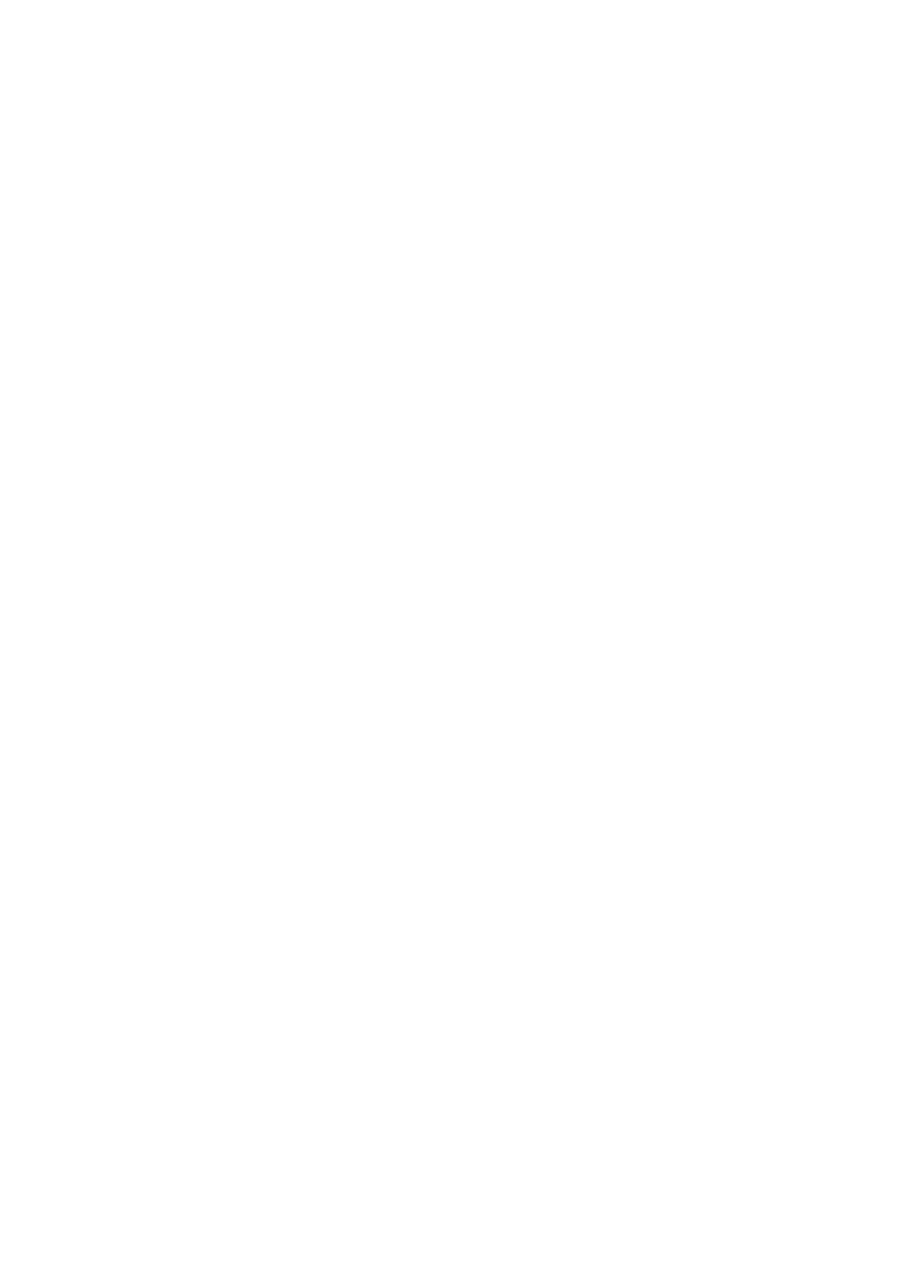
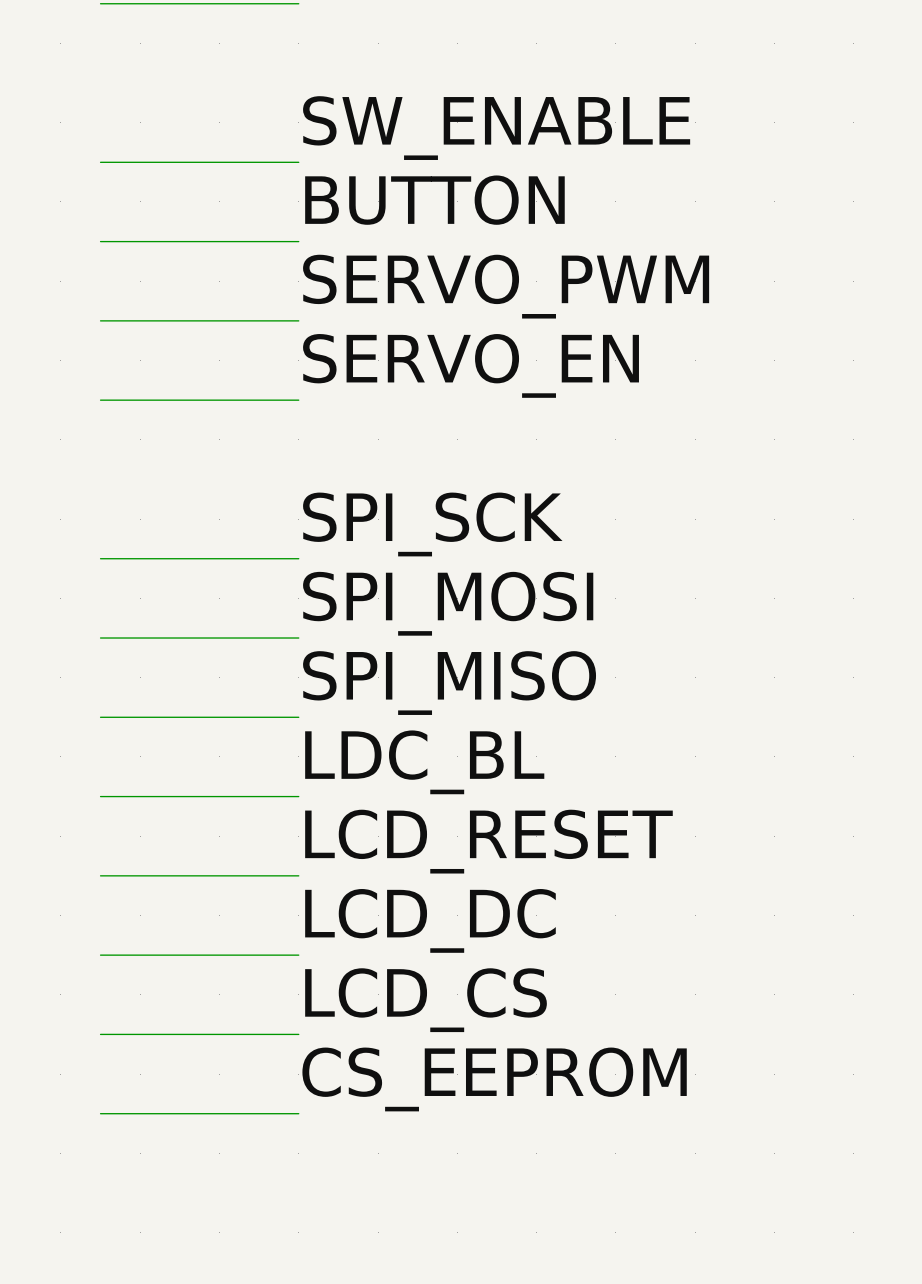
wire: none -> (100, 3) (298, 3)
label: none -> SW_ENABLE (496, 128)
wire: none -> (100, 162) (298, 162)
label: none -> BUTTON (434, 200)
wire: none -> (100, 241) (298, 241)
label: none -> SERVO_PWM (506, 286)
wire: none -> (100, 320) (298, 320)
label: none -> SERVO_EN (471, 365)
wire: none -> (100, 400) (298, 400)
label: none -> SPI_SCK (432, 524)
wire: none -> (100, 558) (298, 558)
label: none -> SPI_MOSI (448, 603)
wire: none -> (100, 638) (298, 638)
label: none -> SPI_MISO (449, 683)
wire: none -> (100, 717) (298, 717)
label: none -> LDC_BL (424, 762)
wire: none -> (100, 796) (298, 796)
label: none -> LCD_RESET (488, 841)
wire: none -> (100, 875) (298, 875)
label: none -> LCD_DC (430, 920)
wire: none -> (100, 955) (298, 955)
label: none -> LCD_CS (426, 1000)
wire: none -> (100, 1034) (298, 1034)
label: none -> CS_EEPROM (494, 1079)
wire: none -> (100, 1113) (298, 1113)

